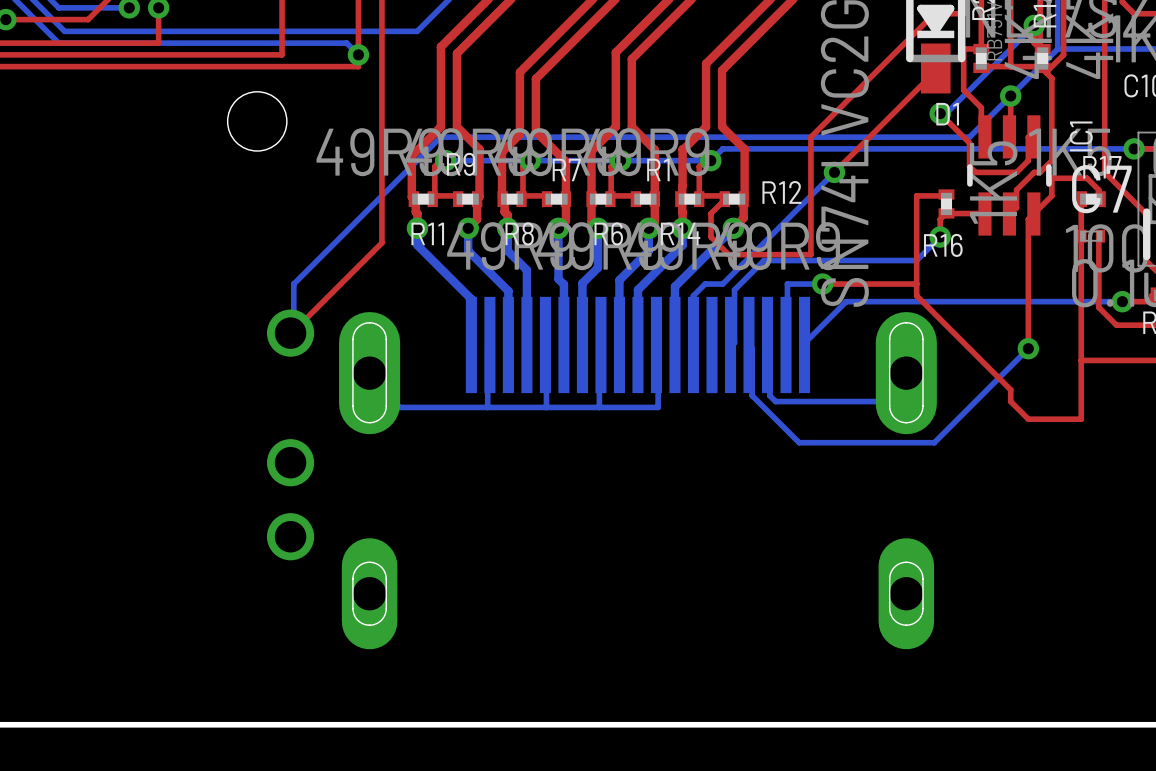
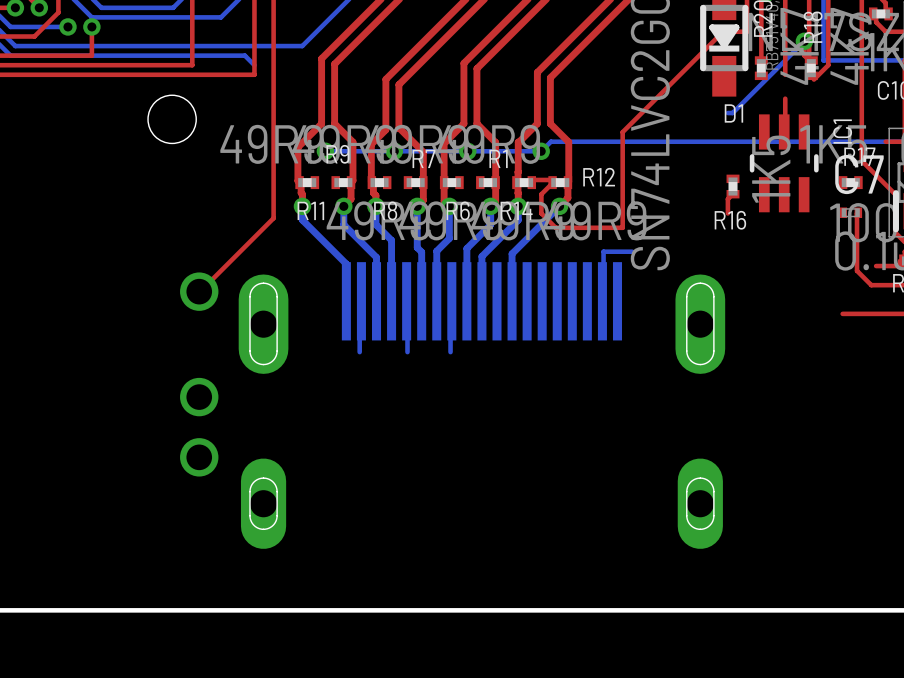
bottom track: (1057, 48) (969, 137) (440, 137) (293, 284) (293, 331) (290, 333) -> none
top track: (981, 49) (963, 48) (963, 90) (981, 107) (981, 131) (984, 136) -> none
via: (358, 54) -> none
top track: (981, 67) (1040, 66) (1051, 78) (1051, 160) (1040, 172) (1034, 172) (1016, 190) (1016, 207) (1009, 214) -> none
top track: (935, 68) (934, 72) (834, 172) -> none
via: (1010, 96) -> none
top track: (940, 113) (969, 143) (969, 166) (975, 172) (1016, 172) (1028, 160) (1028, 137) (1033, 136) -> none
via: (940, 113) -> none
via: (1134, 148) -> none
top track: (445, 160) (440, 160) (434, 166) (434, 195) -> none
top track: (530, 160) (522, 166) (522, 195) -> none
top track: (620, 160) (617, 160) (611, 166) (611, 195) -> none
top track: (710, 160) (705, 160) (699, 166) (699, 199) -> none
bottom track: (834, 172) (722, 284) (705, 284) (693, 295) (693, 344) -> none
via: (834, 172) -> none
top track: (946, 194) (916, 195) (916, 295) (1010, 389) (1010, 401) (1028, 419) (1081, 419) (1081, 199) -> none
top track: (434, 195) (458, 195) (458, 199) -> none
top track: (522, 195) (546, 195) (547, 199) -> none
top track: (611, 195) (634, 195) (635, 199) -> none
top track: (1100, 199) (1098, 190) (1087, 178) (1051, 178) (1051, 195) (1034, 213) -> none
top track: (946, 213) (984, 214) -> none
top track: (1033, 214) (1028, 219) (1028, 348) -> none
bottom track: (940, 237) (916, 260) (763, 260) (734, 289) (734, 342) (730, 344) -> none
via: (940, 237) -> none
top track: (822, 284) (916, 284) -> none
via: (822, 284) -> none
bottom track: (1122, 301) (846, 301) (804, 344) -> none
via: (1122, 301) -> none
bottom track: (656, 344) (658, 348) (658, 407) (399, 407) (370, 378) (369, 373) -> none
bottom track: (749, 344) (752, 348) (752, 395) (799, 442) (934, 442) (1028, 348) -> none
bottom track: (767, 344) (769, 348) (769, 395) (775, 401) (881, 401) (904, 378) (906, 373) -> none
via: (1028, 348) -> none

